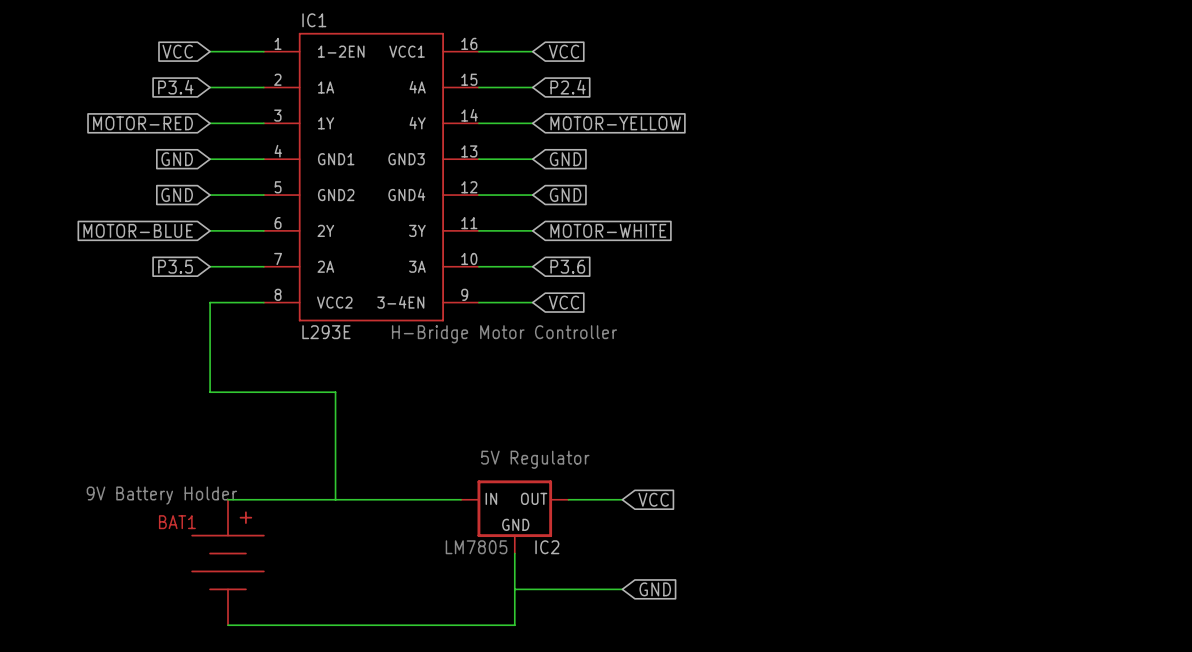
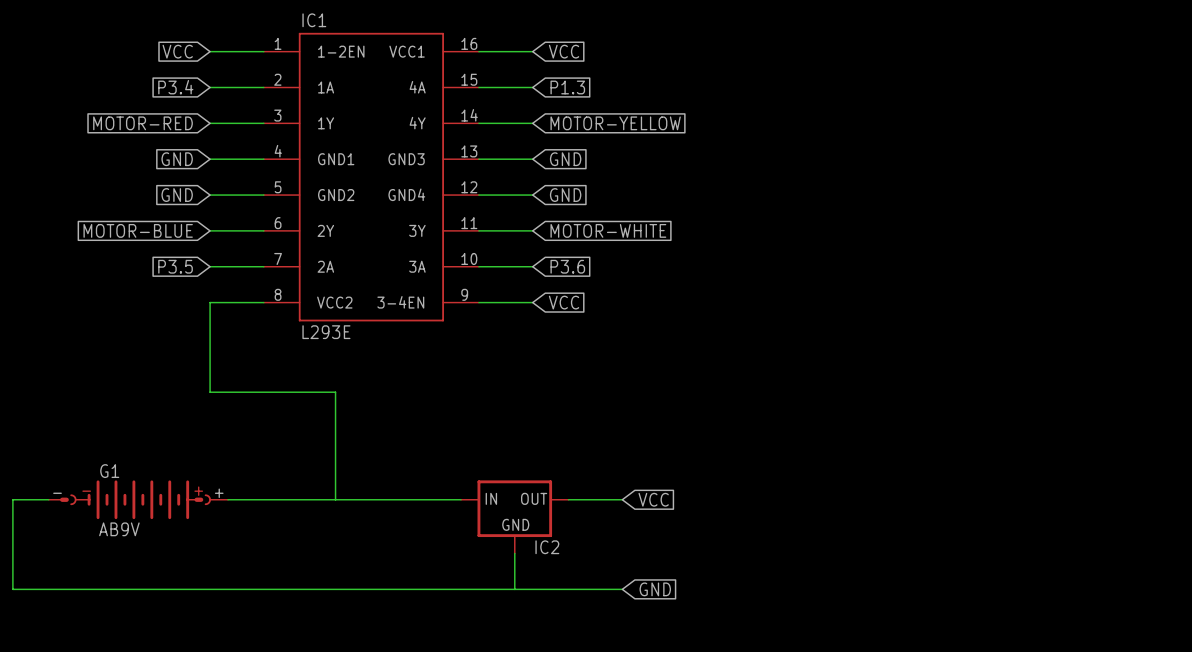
global label: P2.4 (568, 87) -> P1.3 (567, 87)
text: H-Bridge Motor Controller (504, 334) -> none
text: 5V Regulator (535, 459) -> none
text: 9V Battery Holder (161, 495) -> none
G1: none -> AB9V (138, 499)
text: LM7805 (476, 547) -> none
BAT1: (228, 562) -> none
wire: (514, 589) (514, 625) (228, 625) -> (514, 589) (12, 589) (12, 499) (48, 499)

